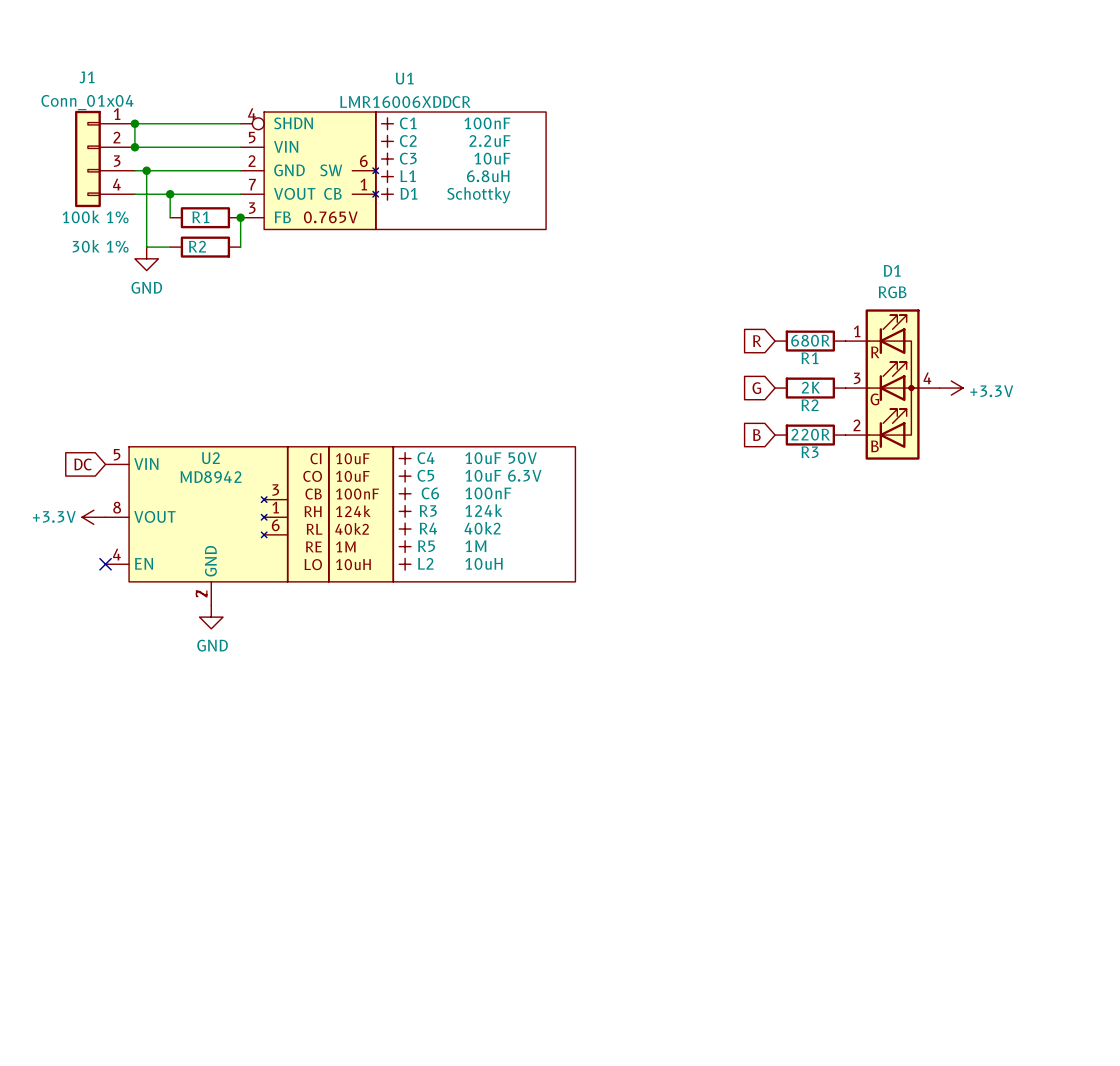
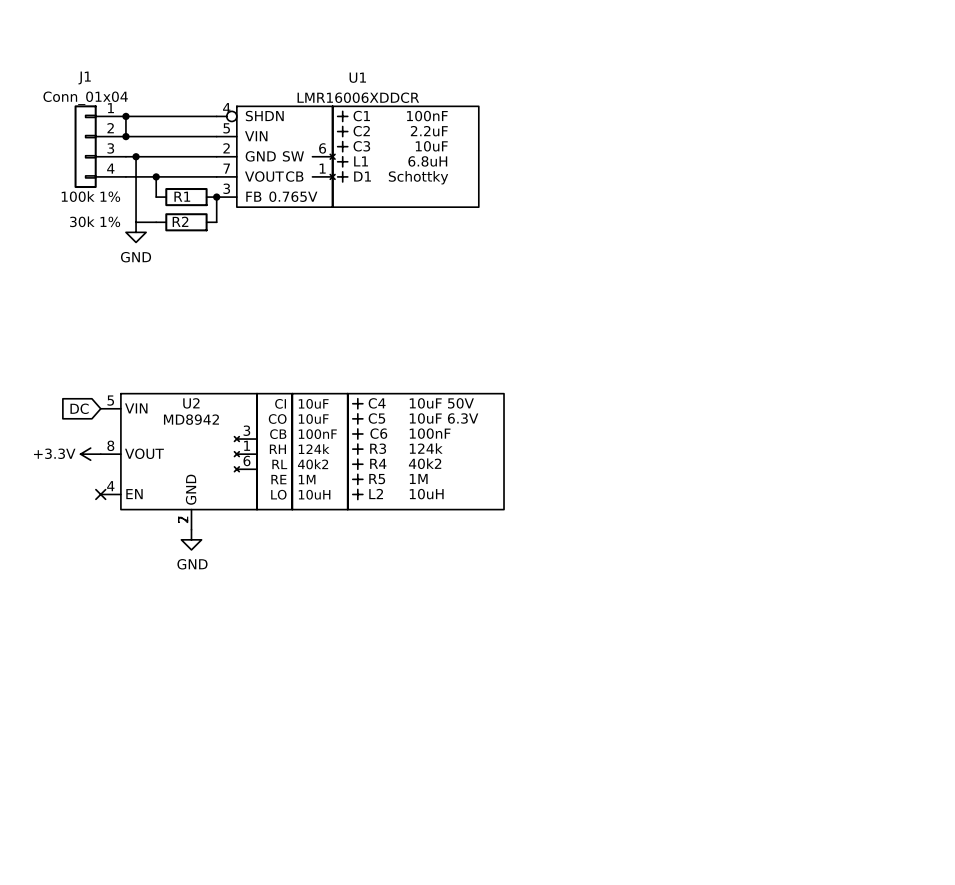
global label: R (757, 341) -> none
R1: 680R (810, 341) -> none
D1: RGB (892, 384) -> none
global label: G (756, 388) -> none
R2: 2K (810, 388) -> none
power symbol: +3.3V (951, 388) -> none
global label: B (756, 435) -> none
R3: 220R (810, 435) -> none

